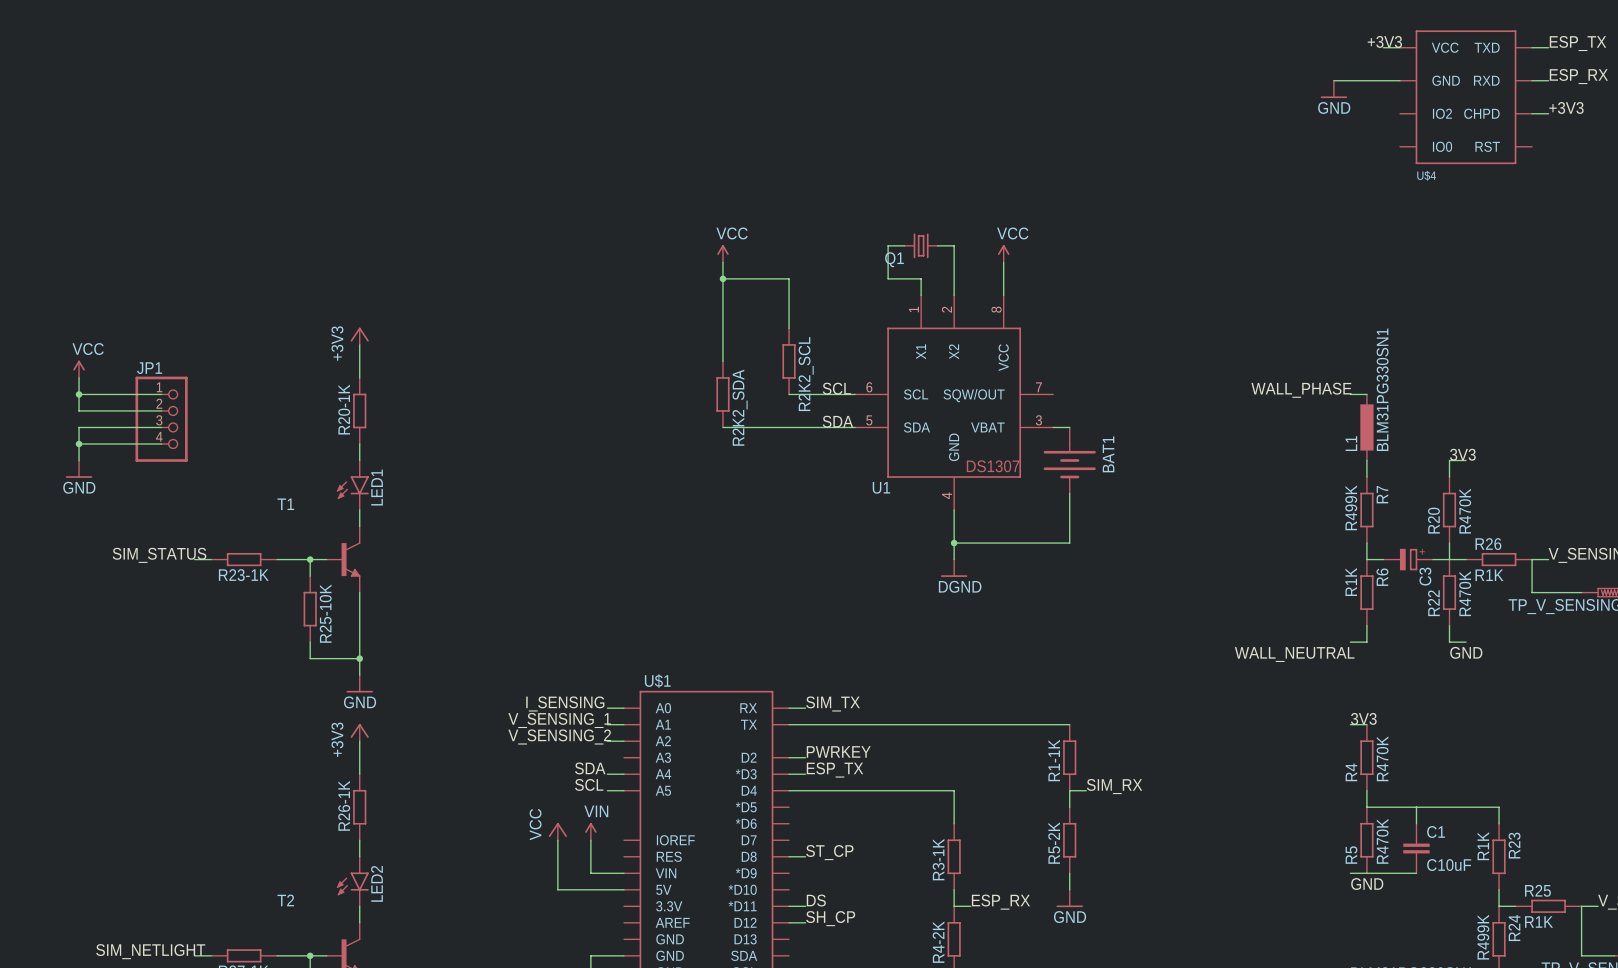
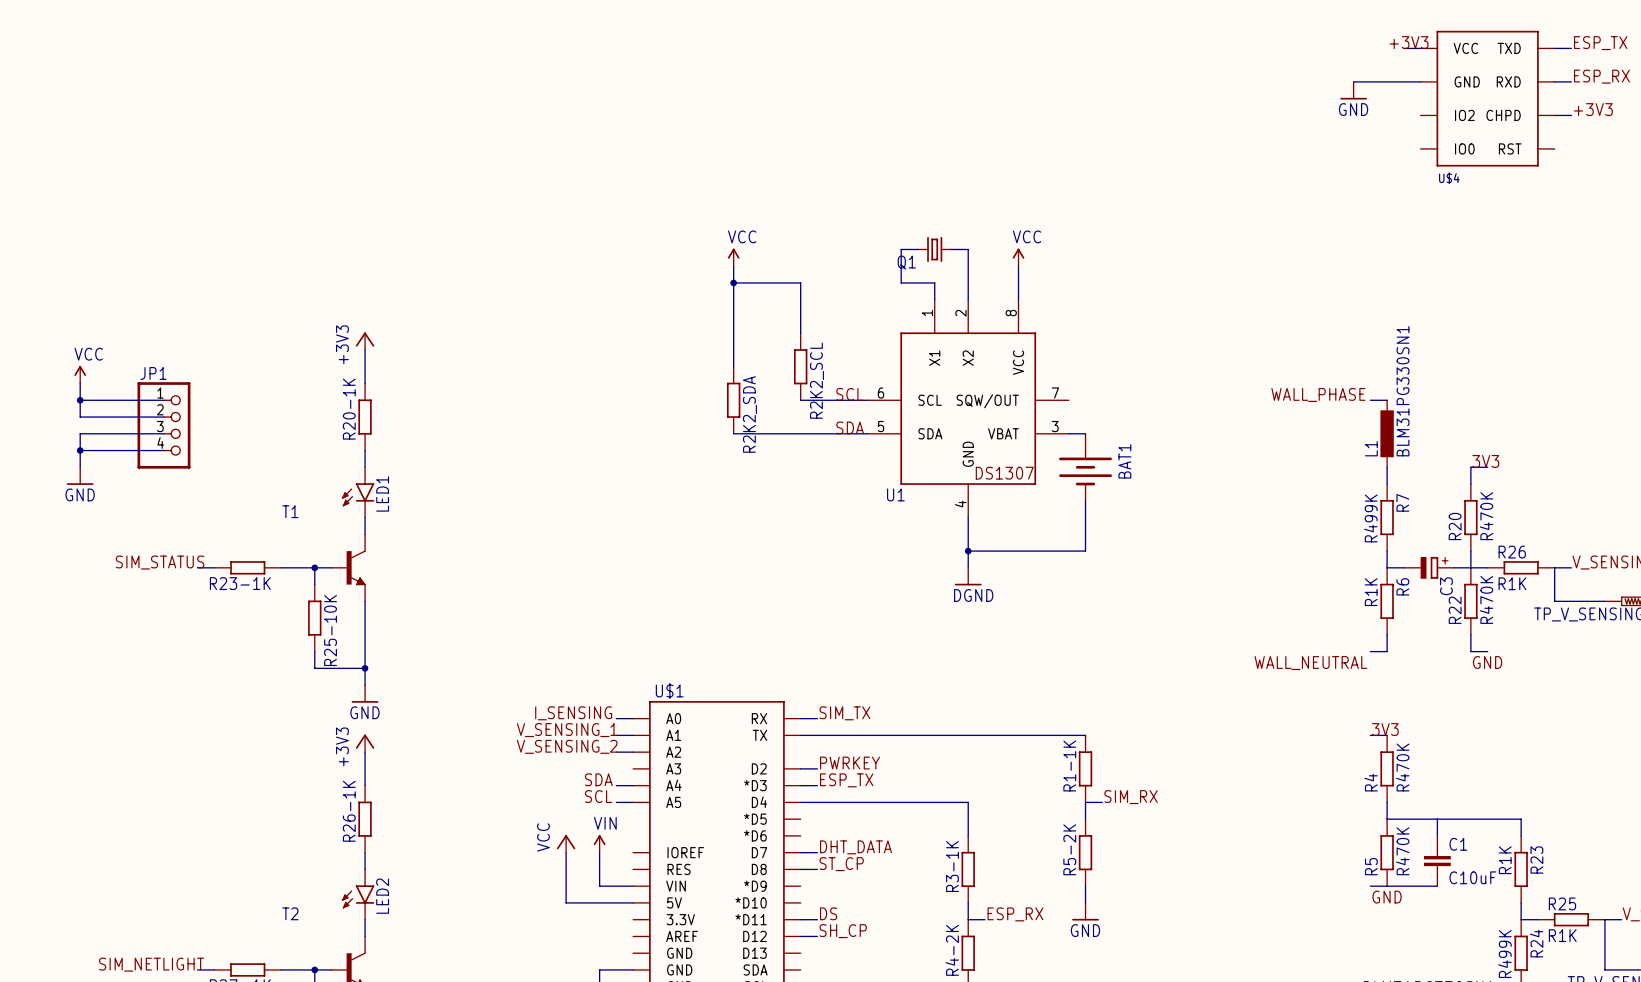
label: none -> DHT_DATA (856, 847)
wire: none -> (800, 852) (817, 852)

